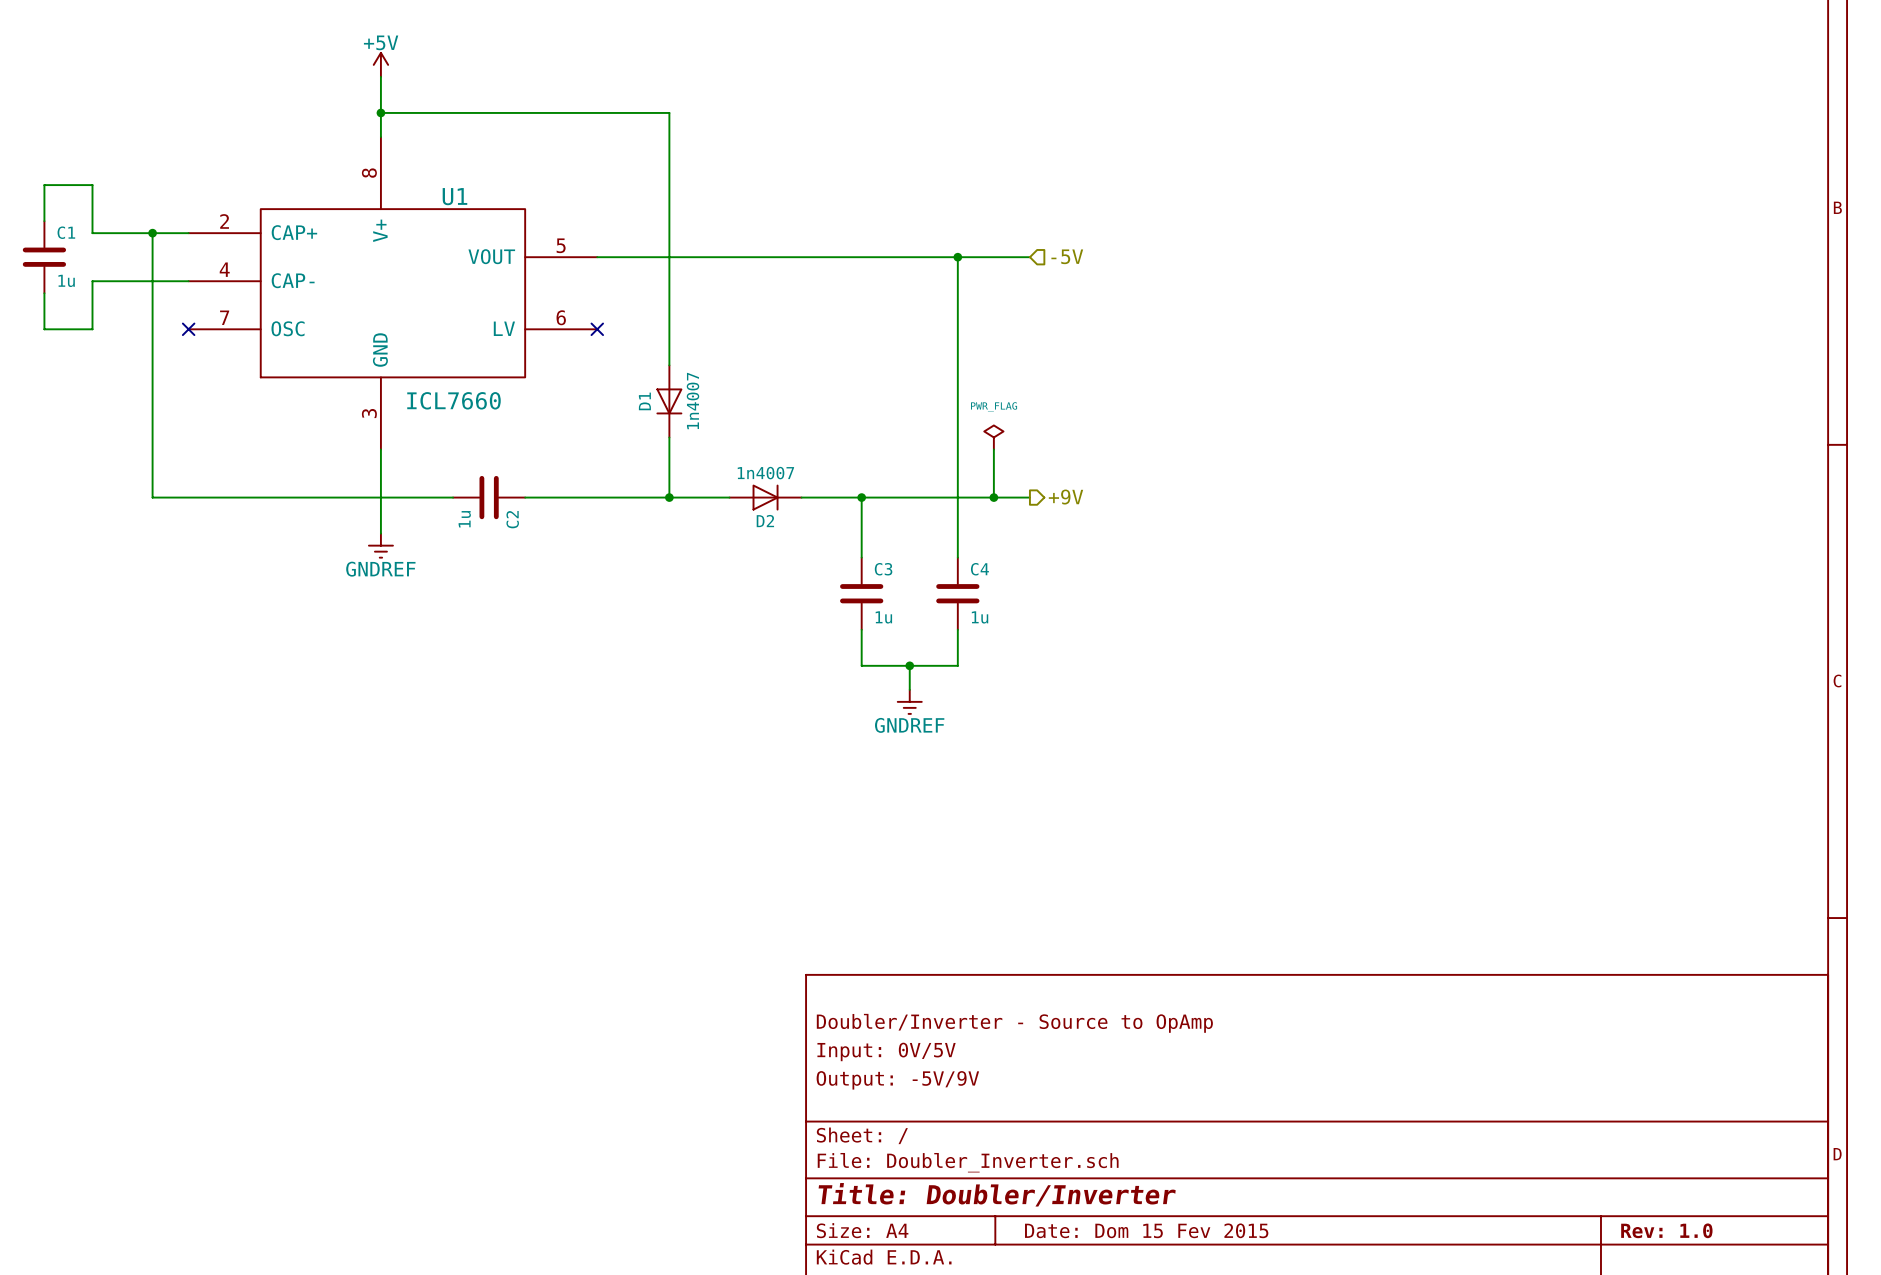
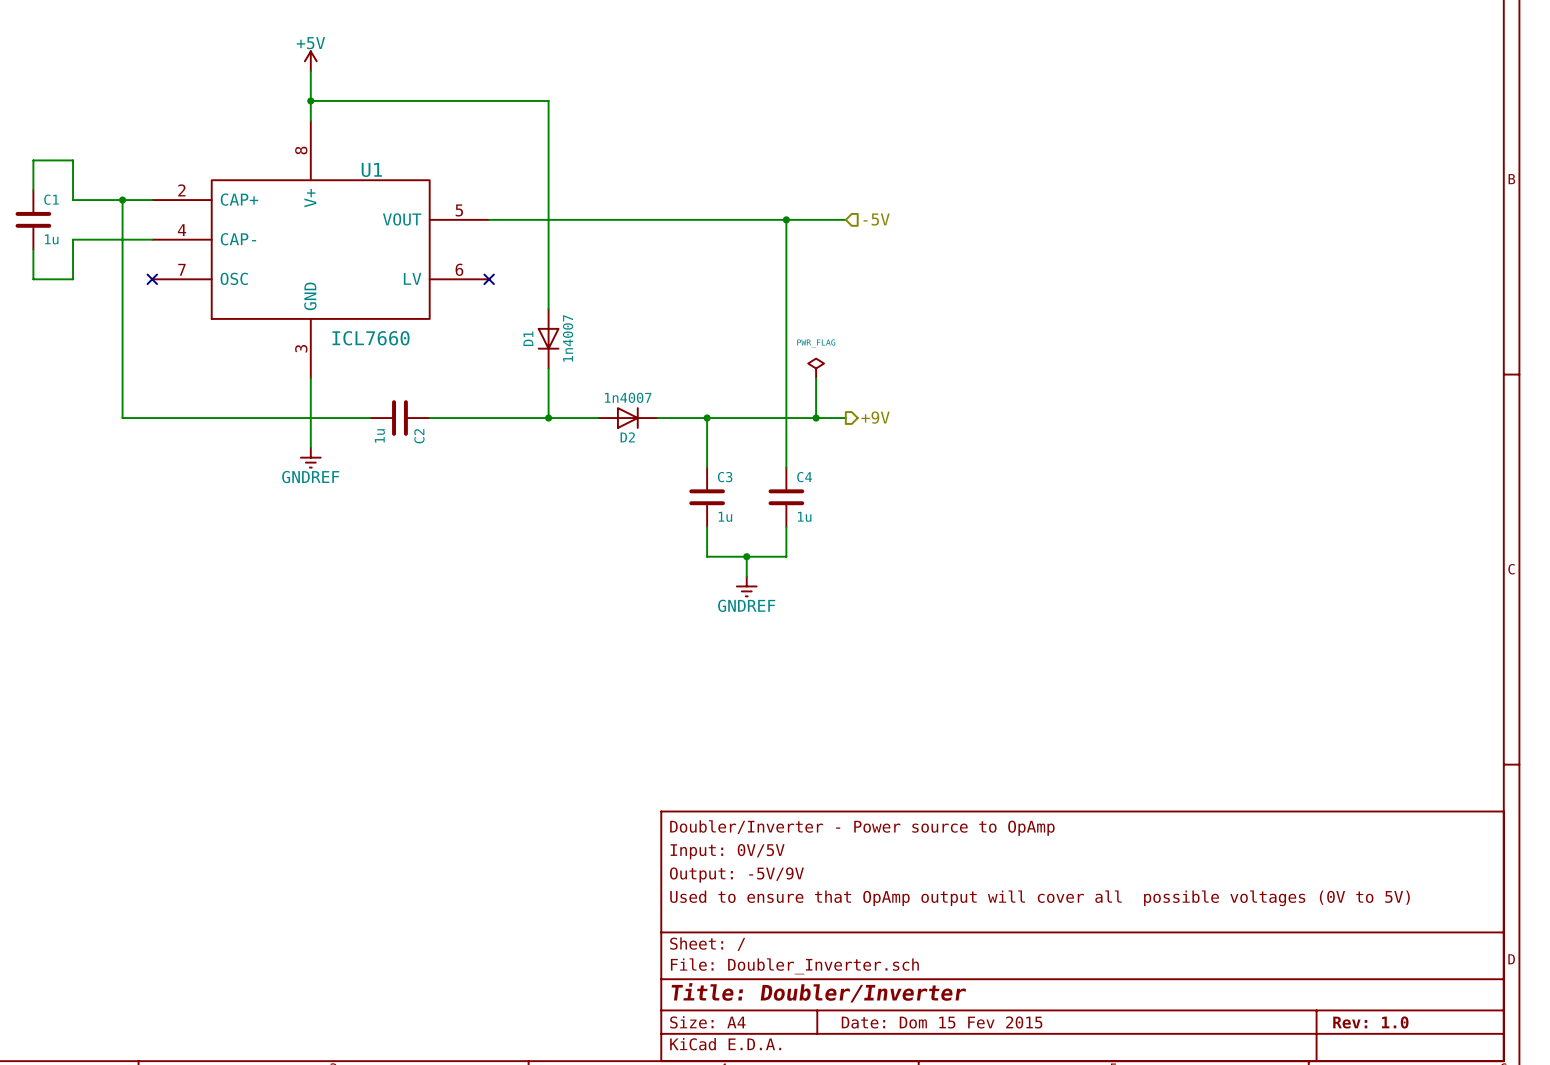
title block: none -> Doubler/Inverter - Power source to OpAmp (862, 828)
title block: Doubler/Inverter - Source to OpAmp (1014, 1023) -> Input: 0V/5V (727, 851)
title block: Input: 0V/5V (886, 1051) -> Output: -5V/9V (736, 875)
title block: Output: -5V/9V (897, 1080) -> Used to ensure that OpAmp output will cover all possible voltages (0V to 5V) (1040, 898)

